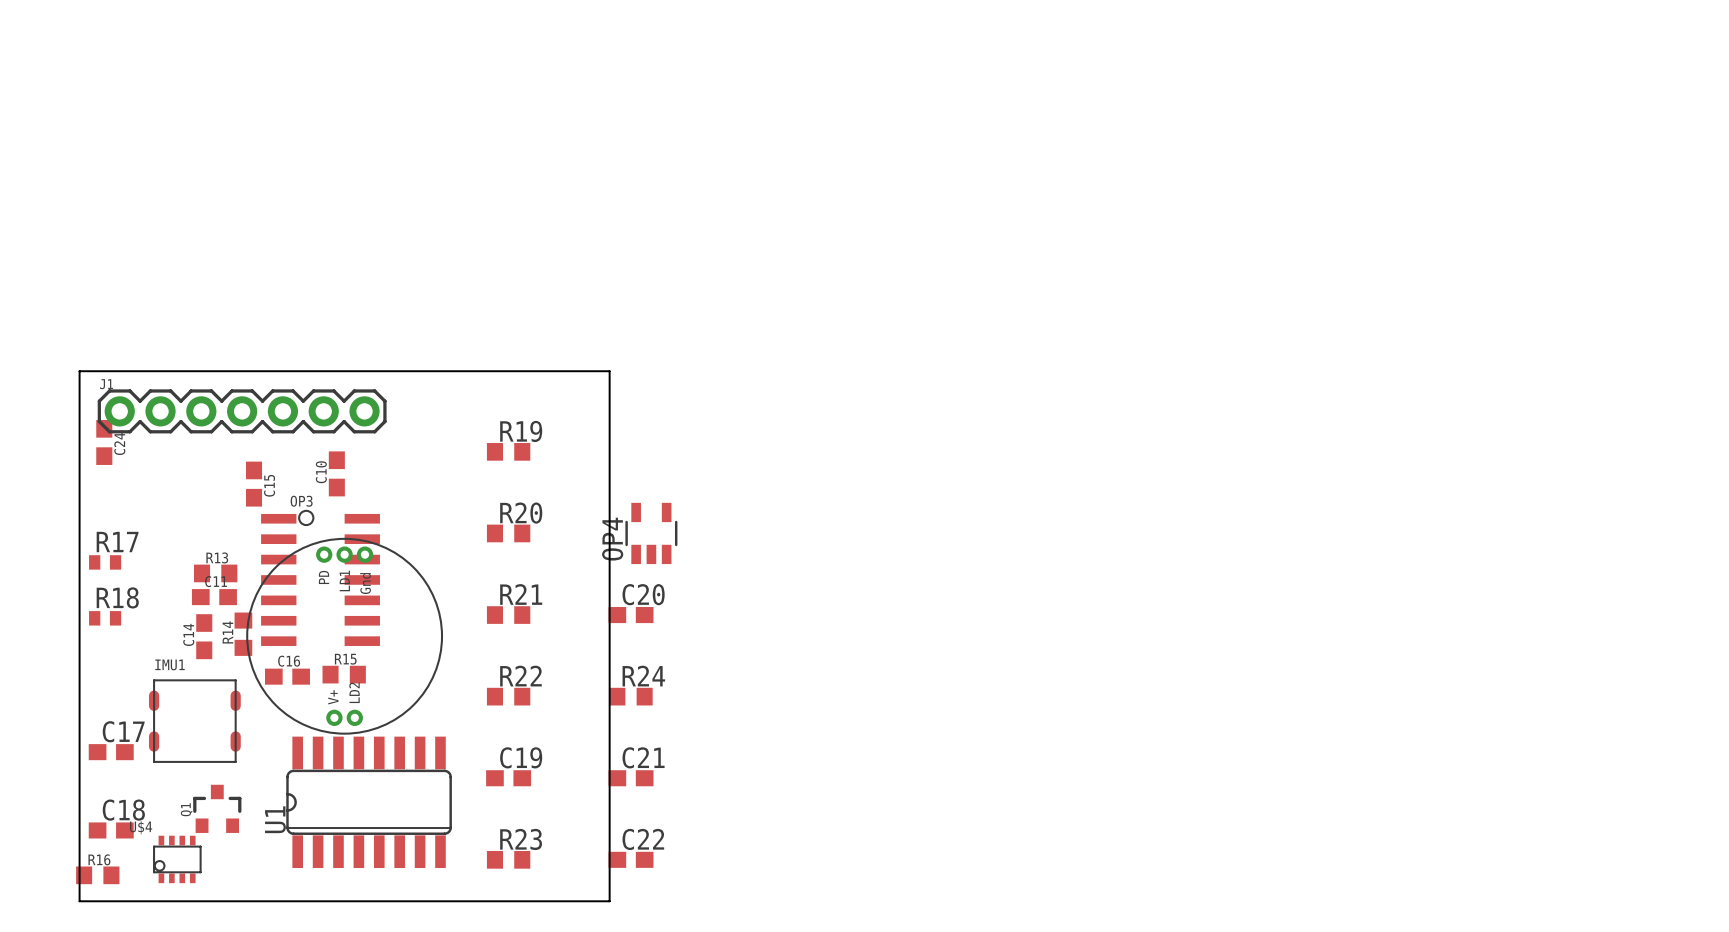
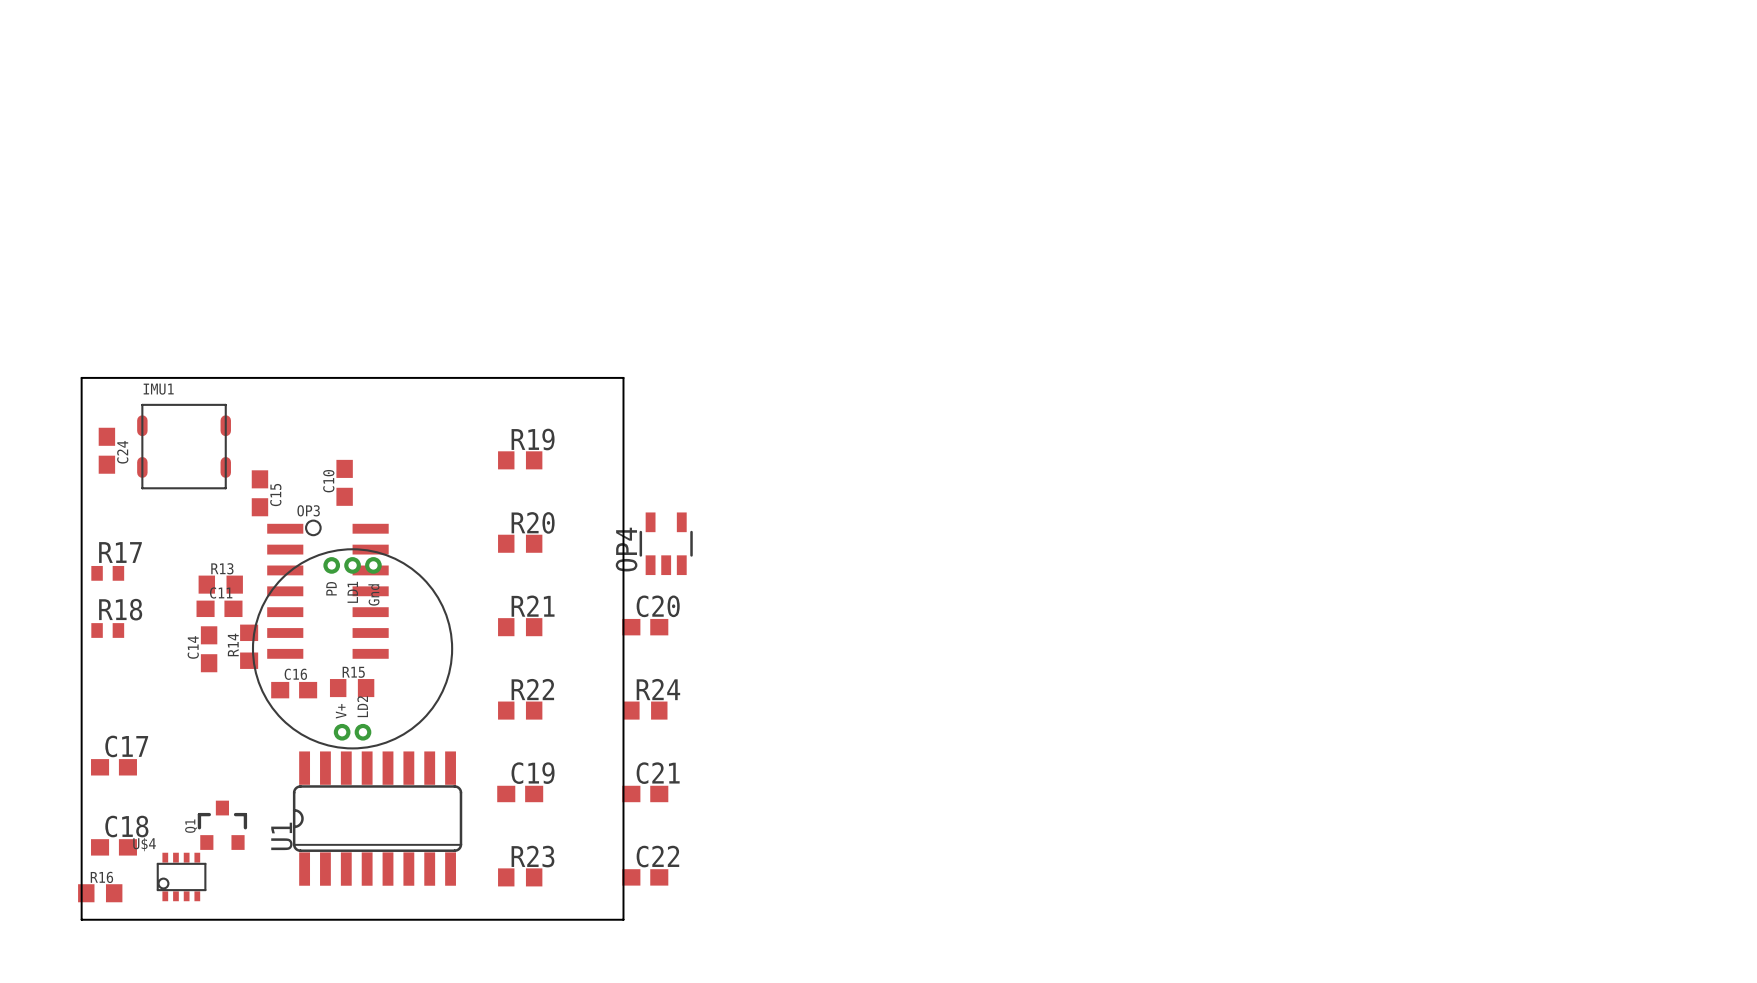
J1: (242, 411) -> none
IMU1 position: (194, 721) -> (184, 446)

